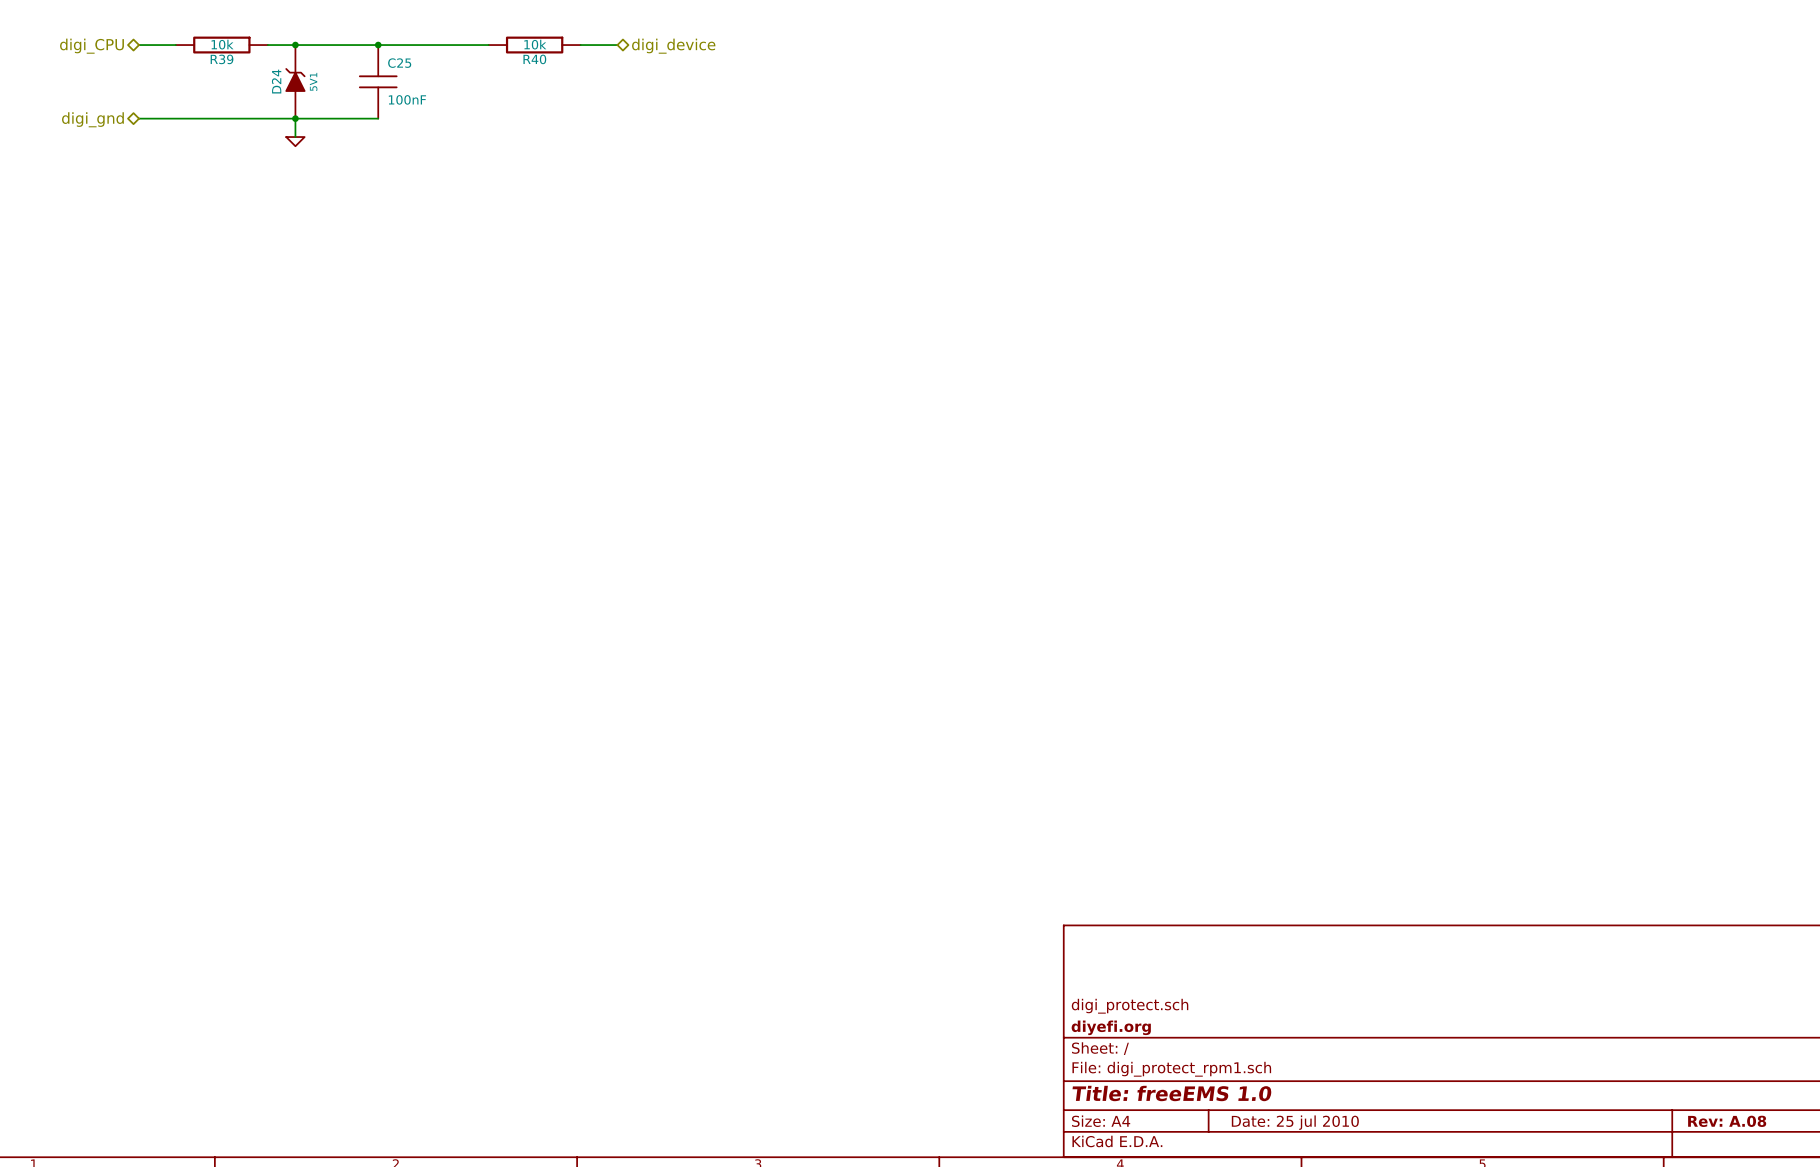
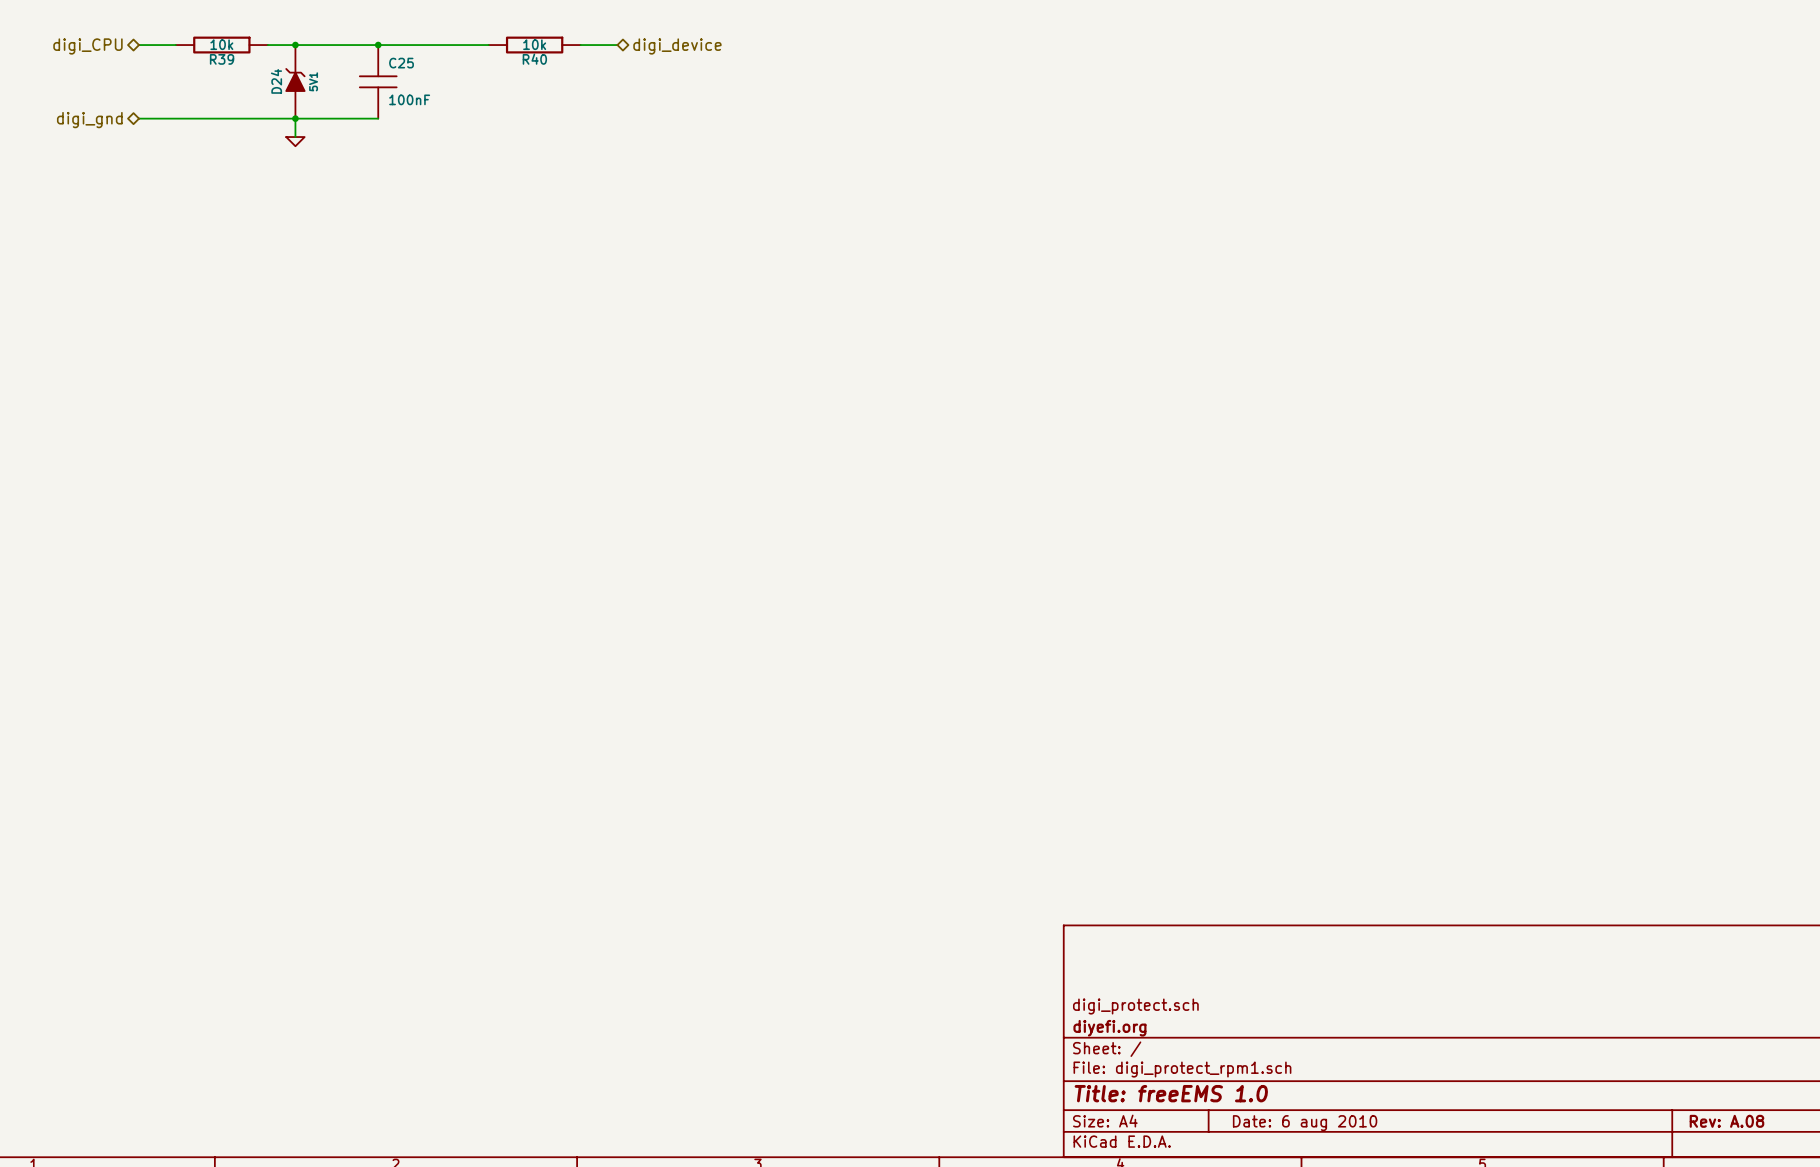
title block: Date: 25 jul 2010 (1295, 1122) -> Date: 6 aug 2010 (1305, 1123)

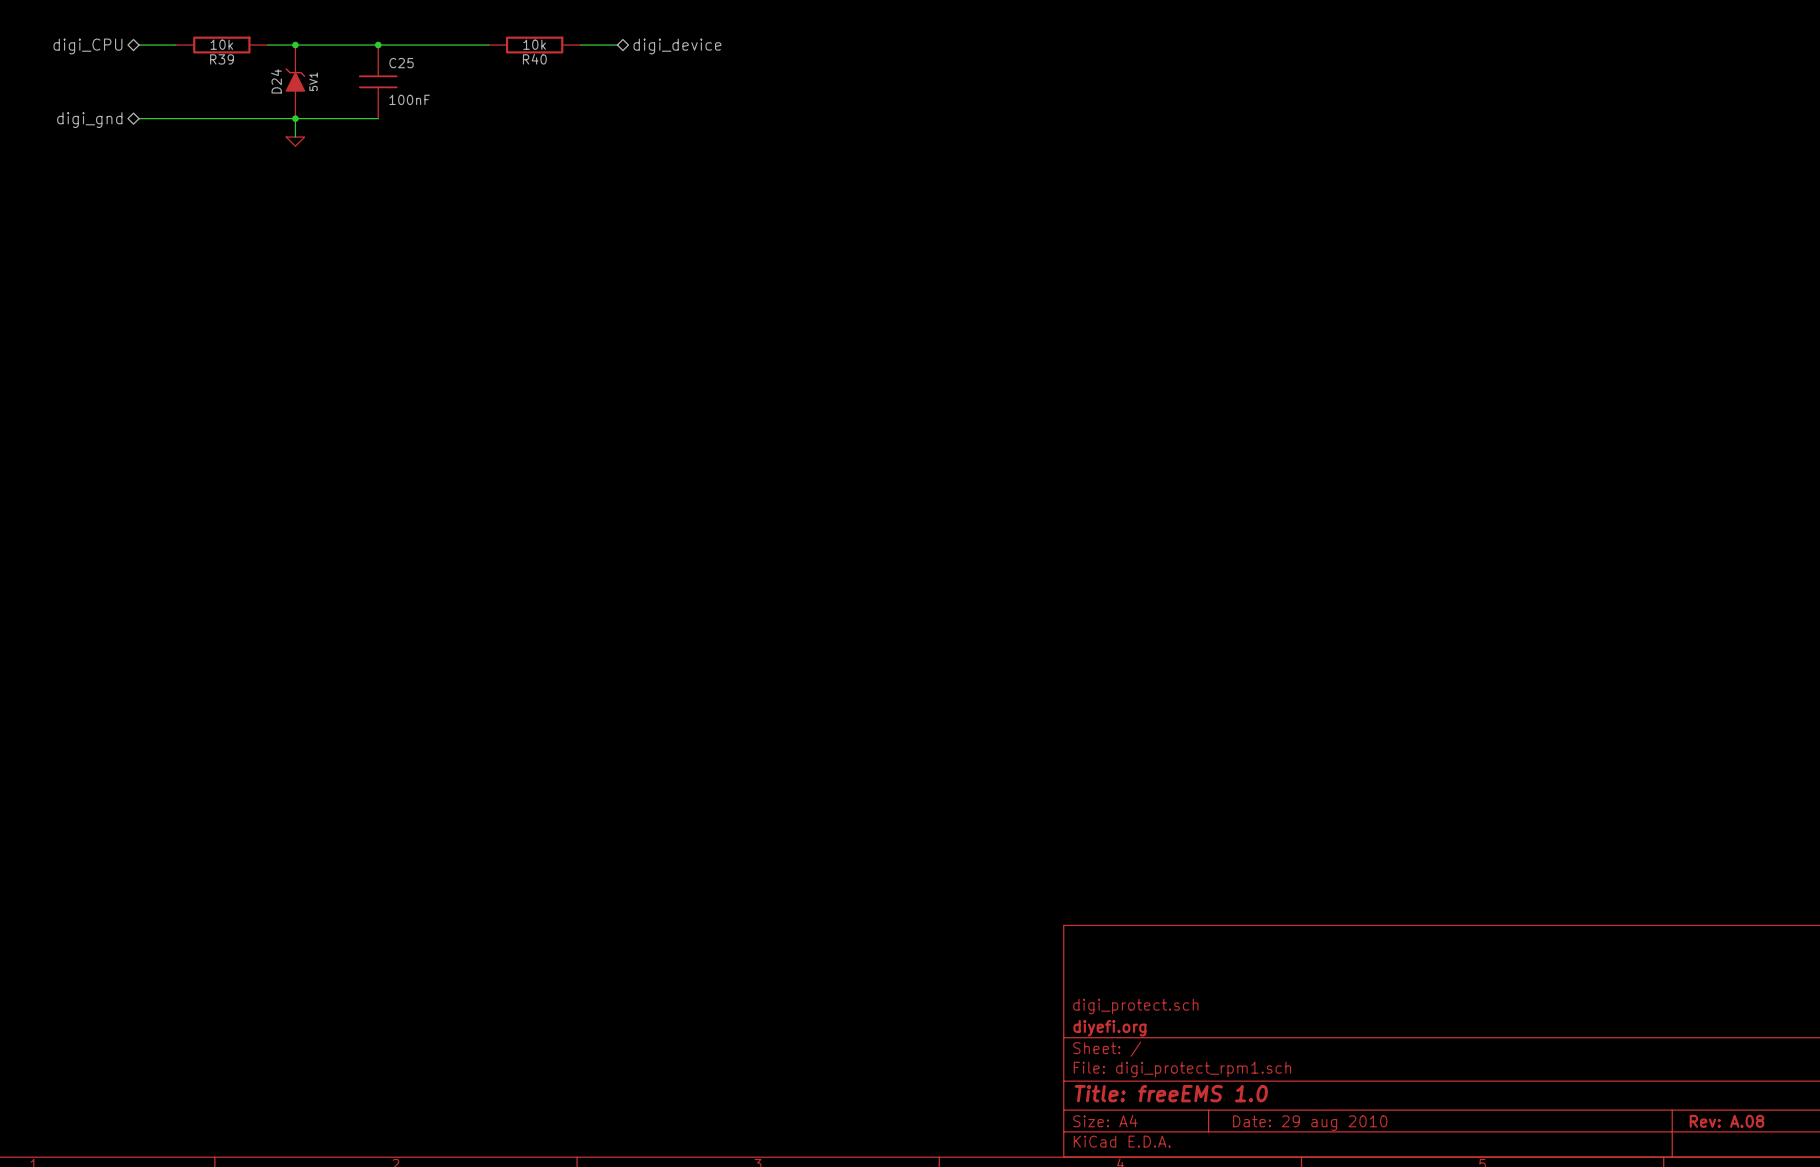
title block: Date: 6 aug 2010 (1305, 1123) -> Date: 29 aug 2010 (1310, 1123)

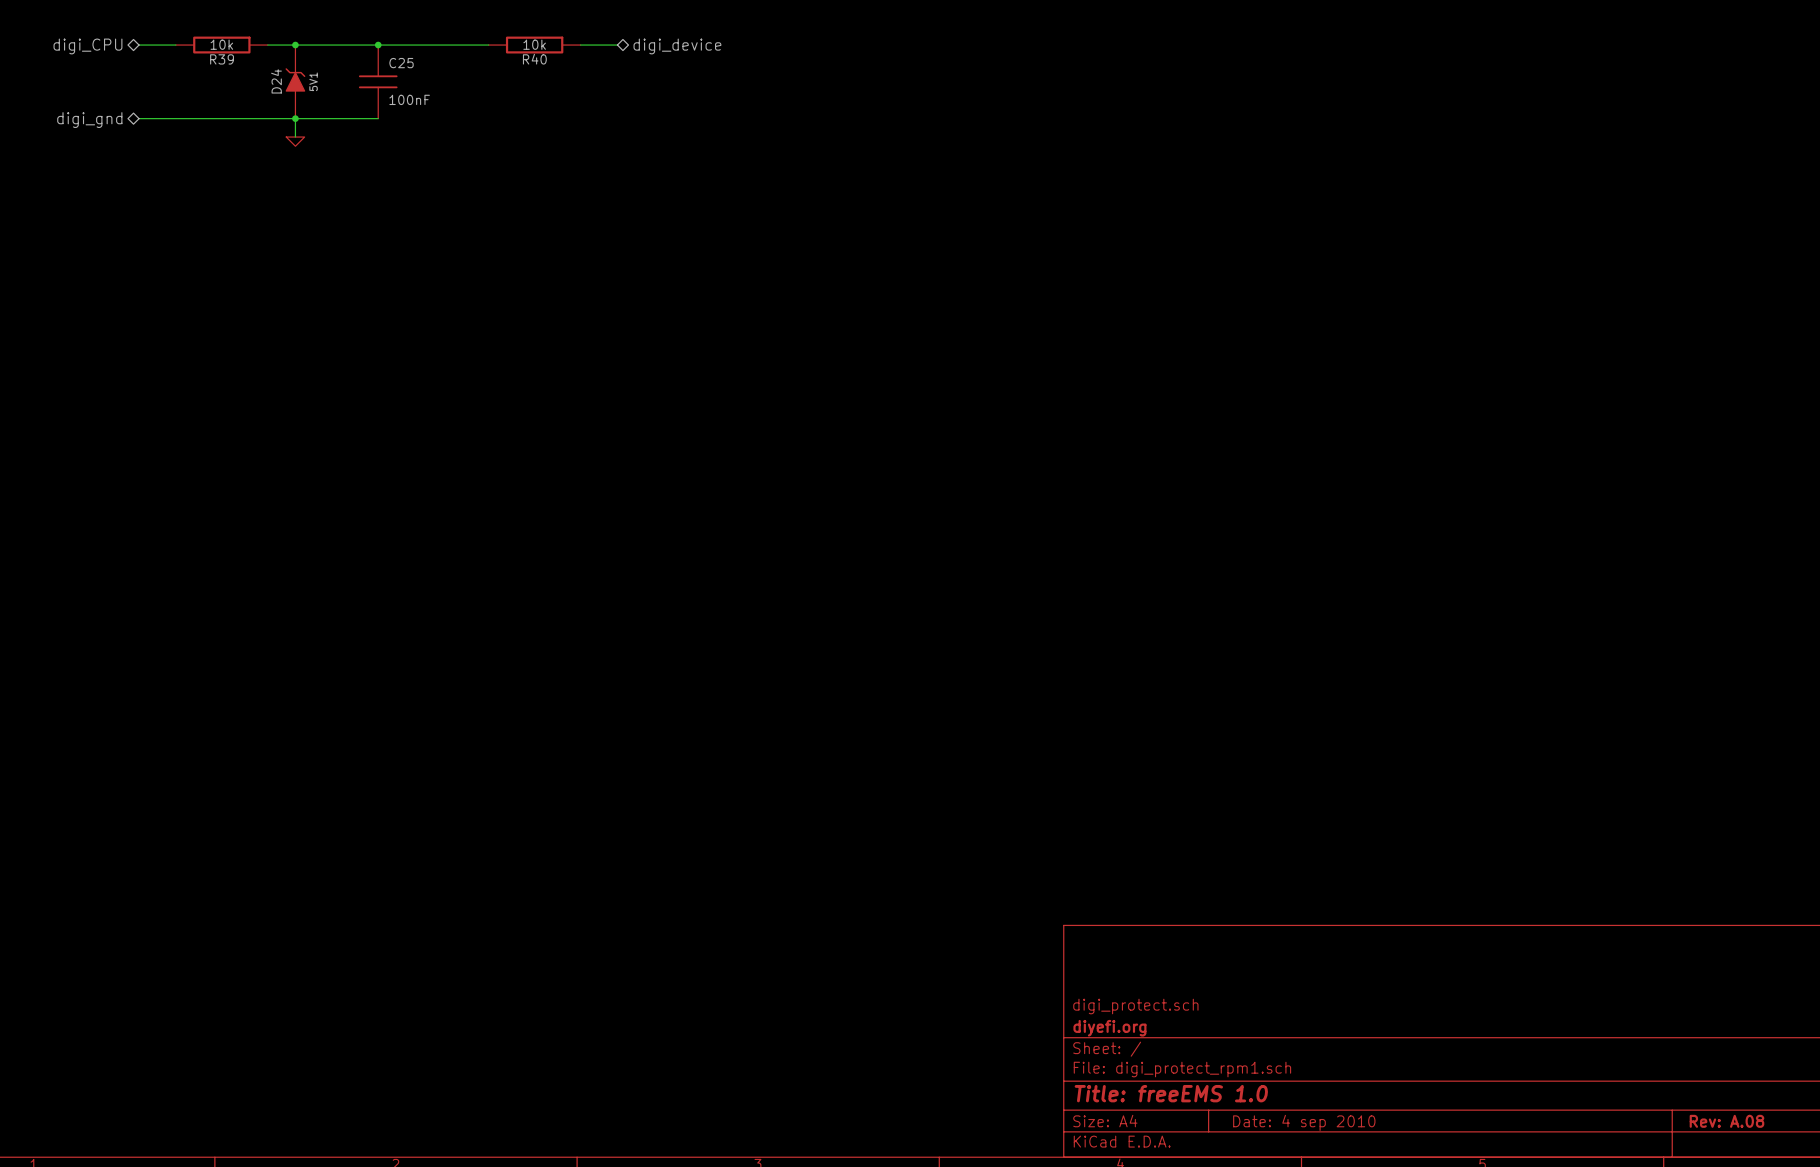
title block: Date: 29 aug 2010 (1310, 1123) -> Date: 4 sep 2010 (1304, 1122)

